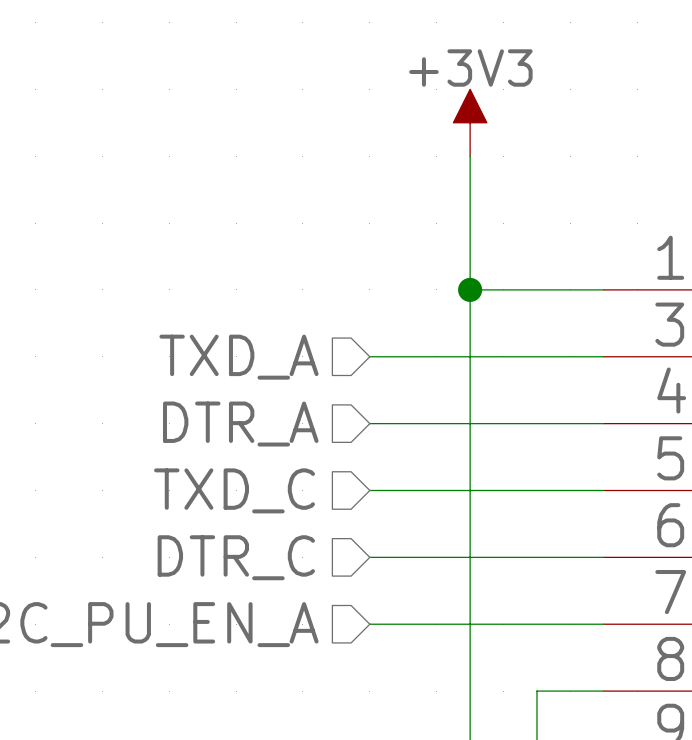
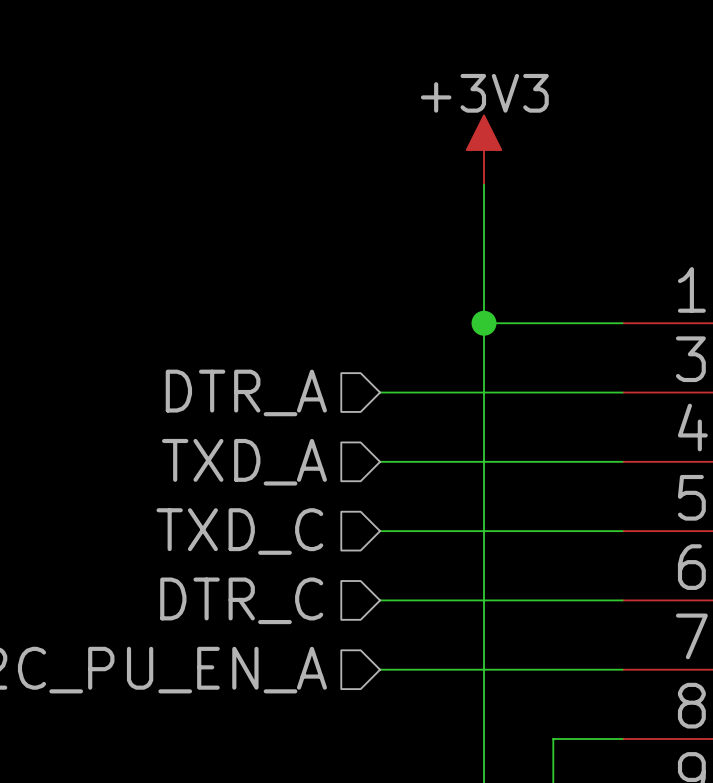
hierarchical label: TXD_A (238, 357) -> DTR_A (246, 392)
hierarchical label: DTR_A (240, 424) -> TXD_A (244, 462)

